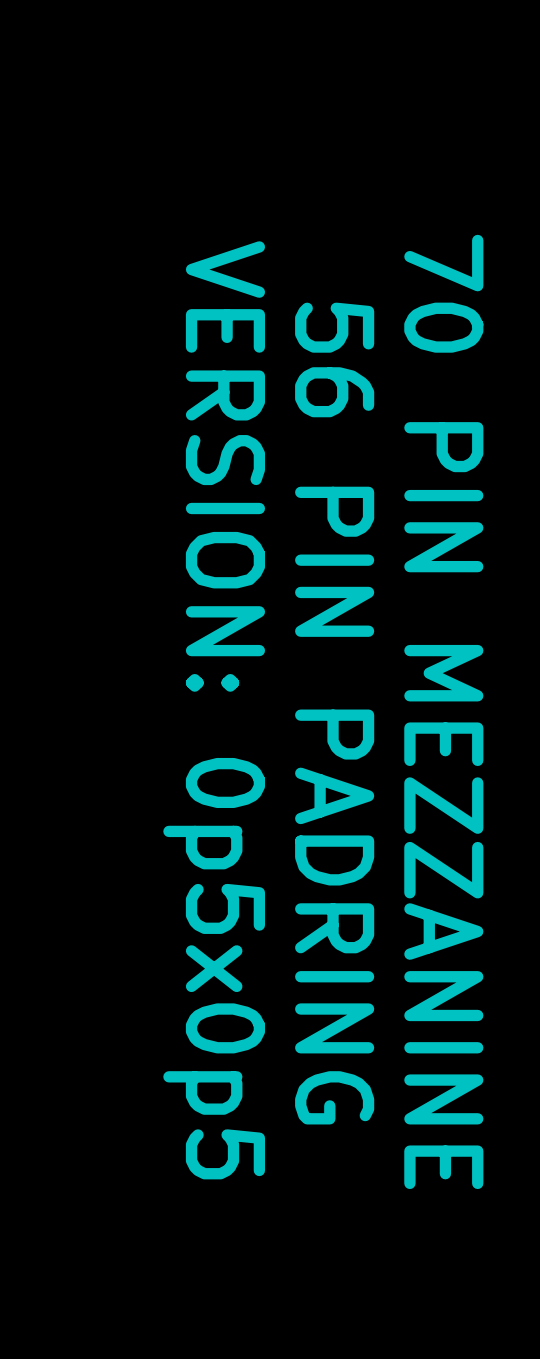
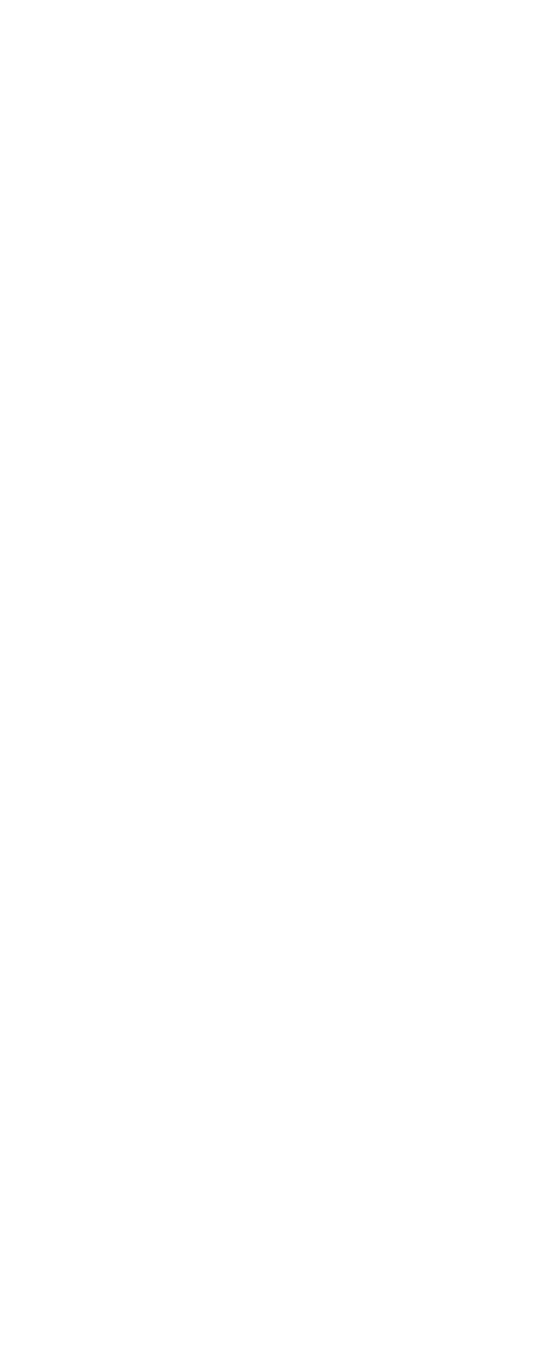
text: VERSION: 0p5x0p5 (214, 710) -> none
text: 70 PIN MEZZANINE (443, 711) -> none
text: 56 PIN PADRING (334, 713) -> none

